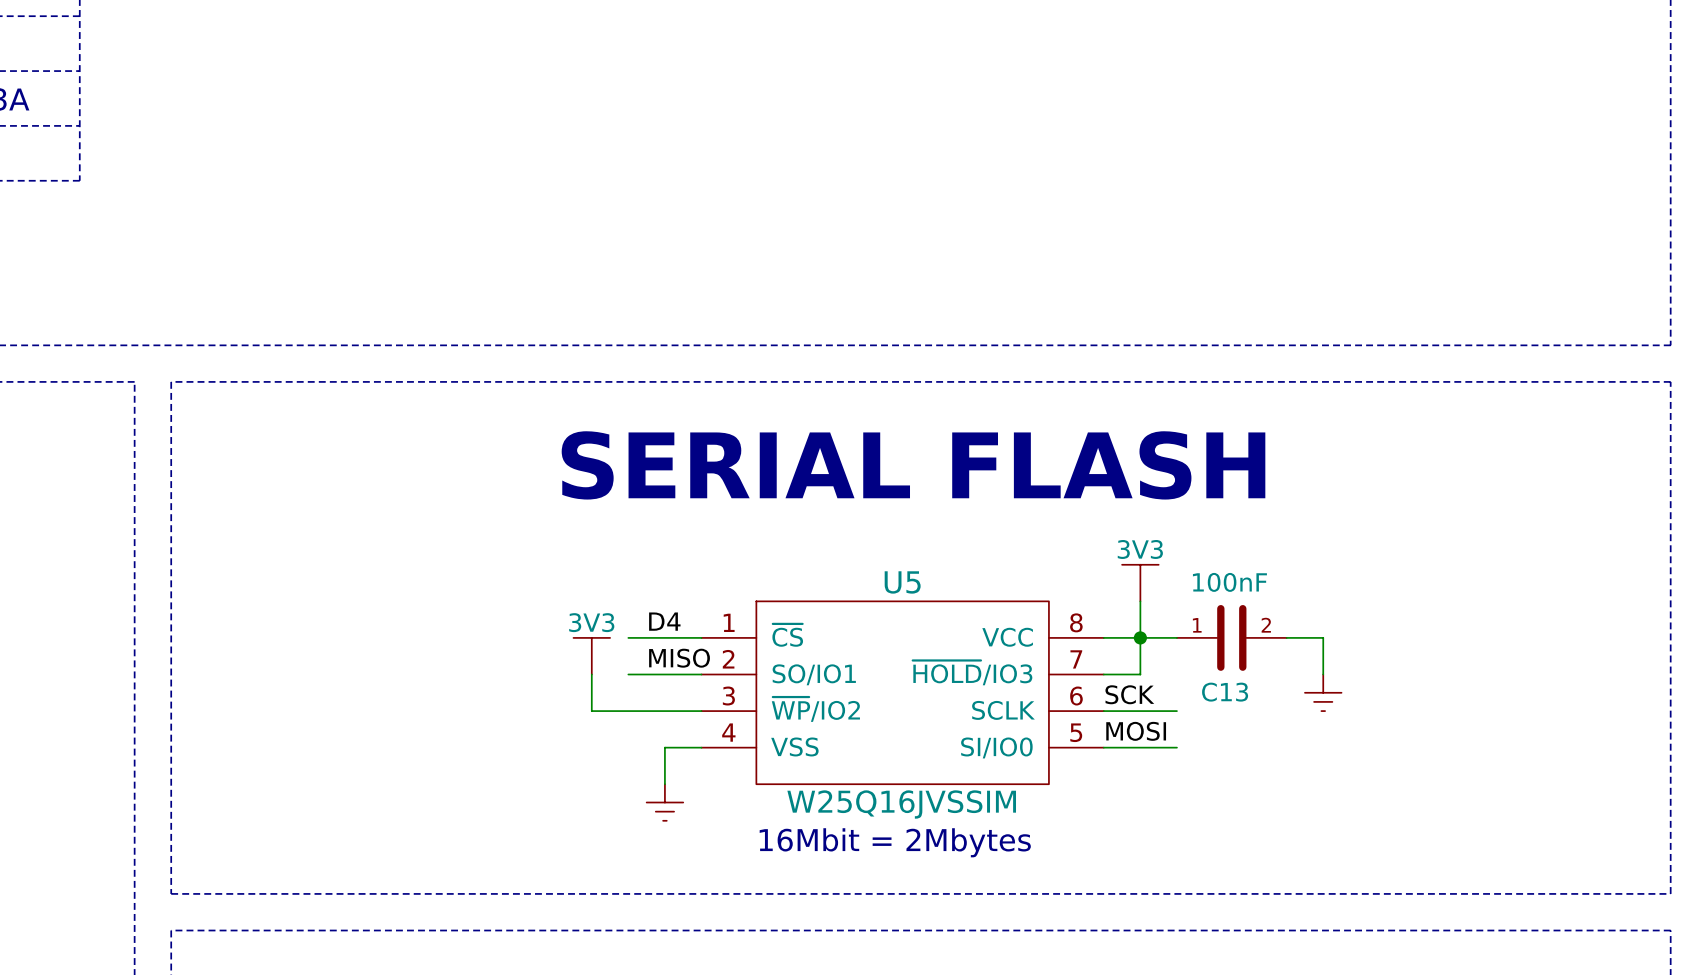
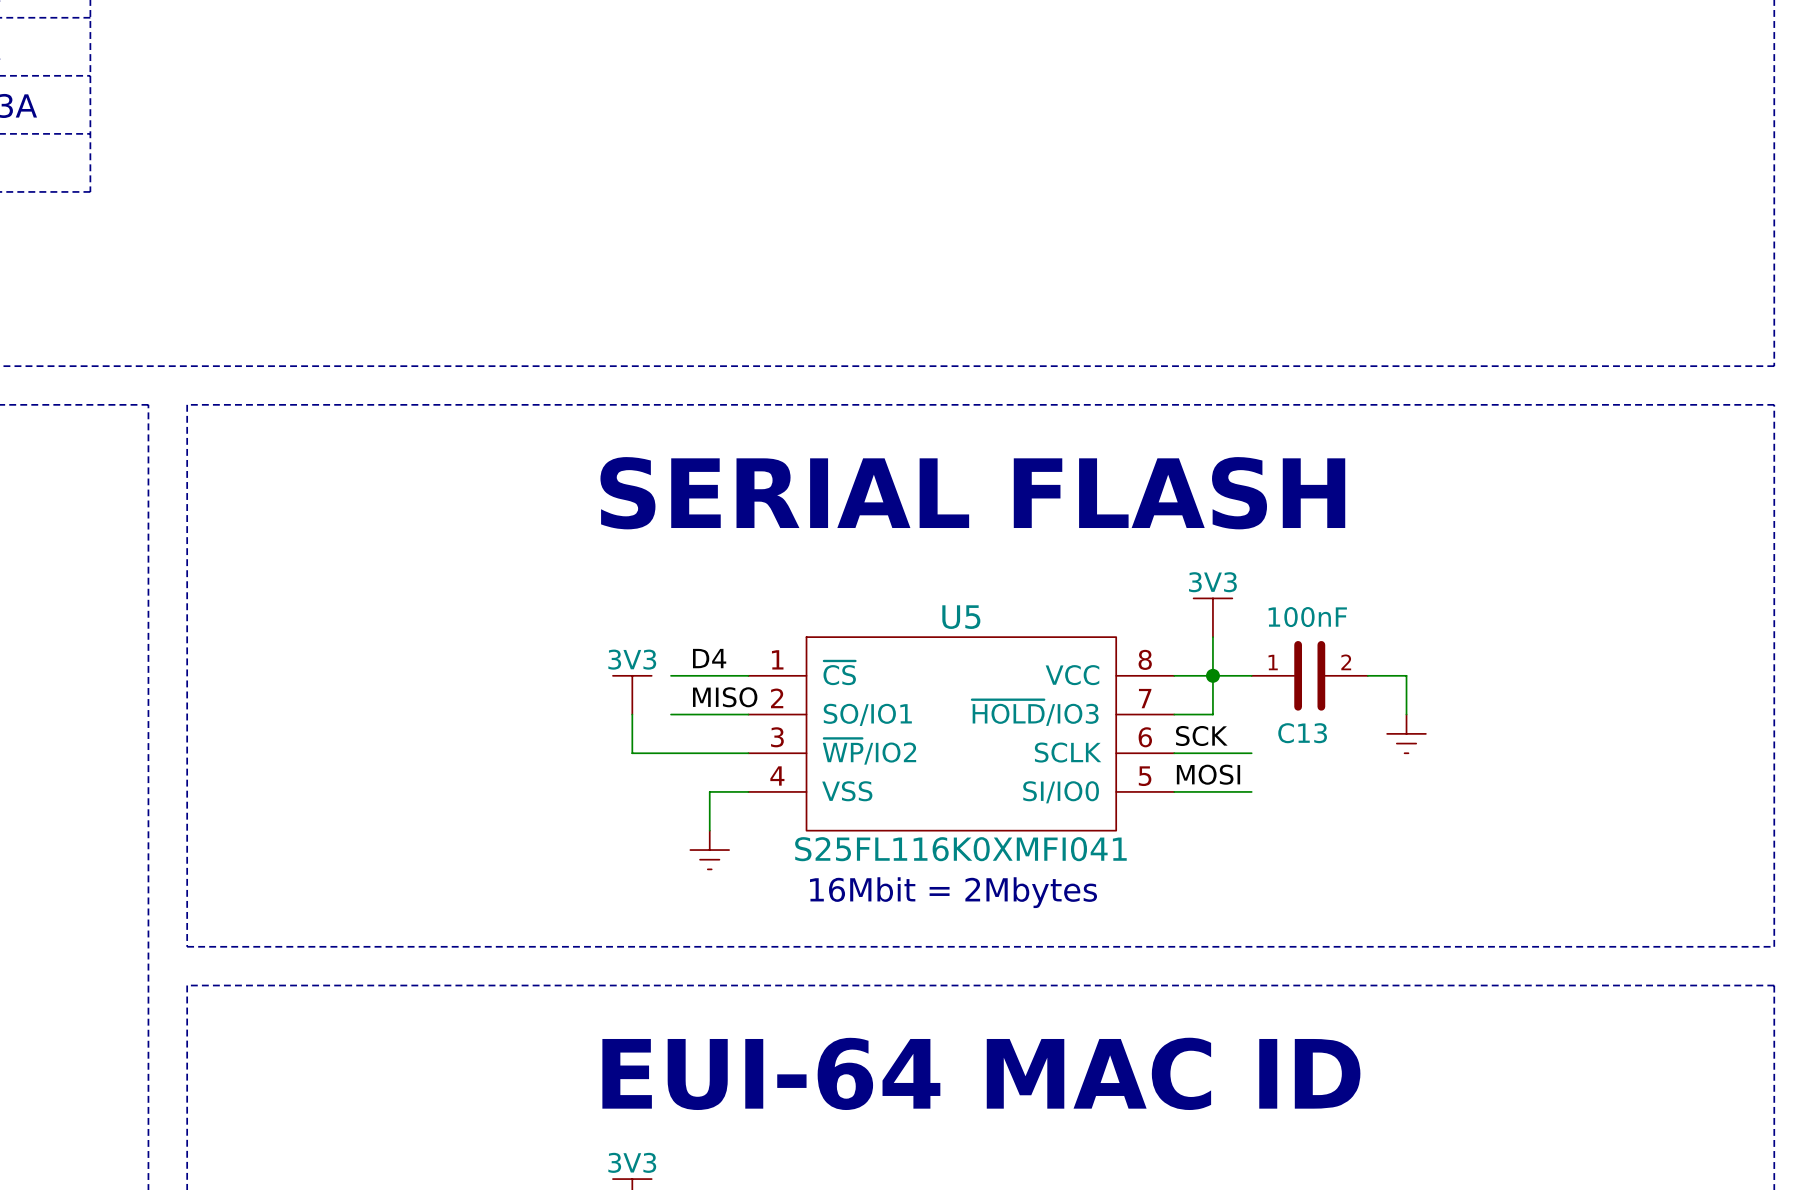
U5 value: W25Q16JVSSIM (901, 804) -> S25FL116K0XMFI041 (960, 849)

